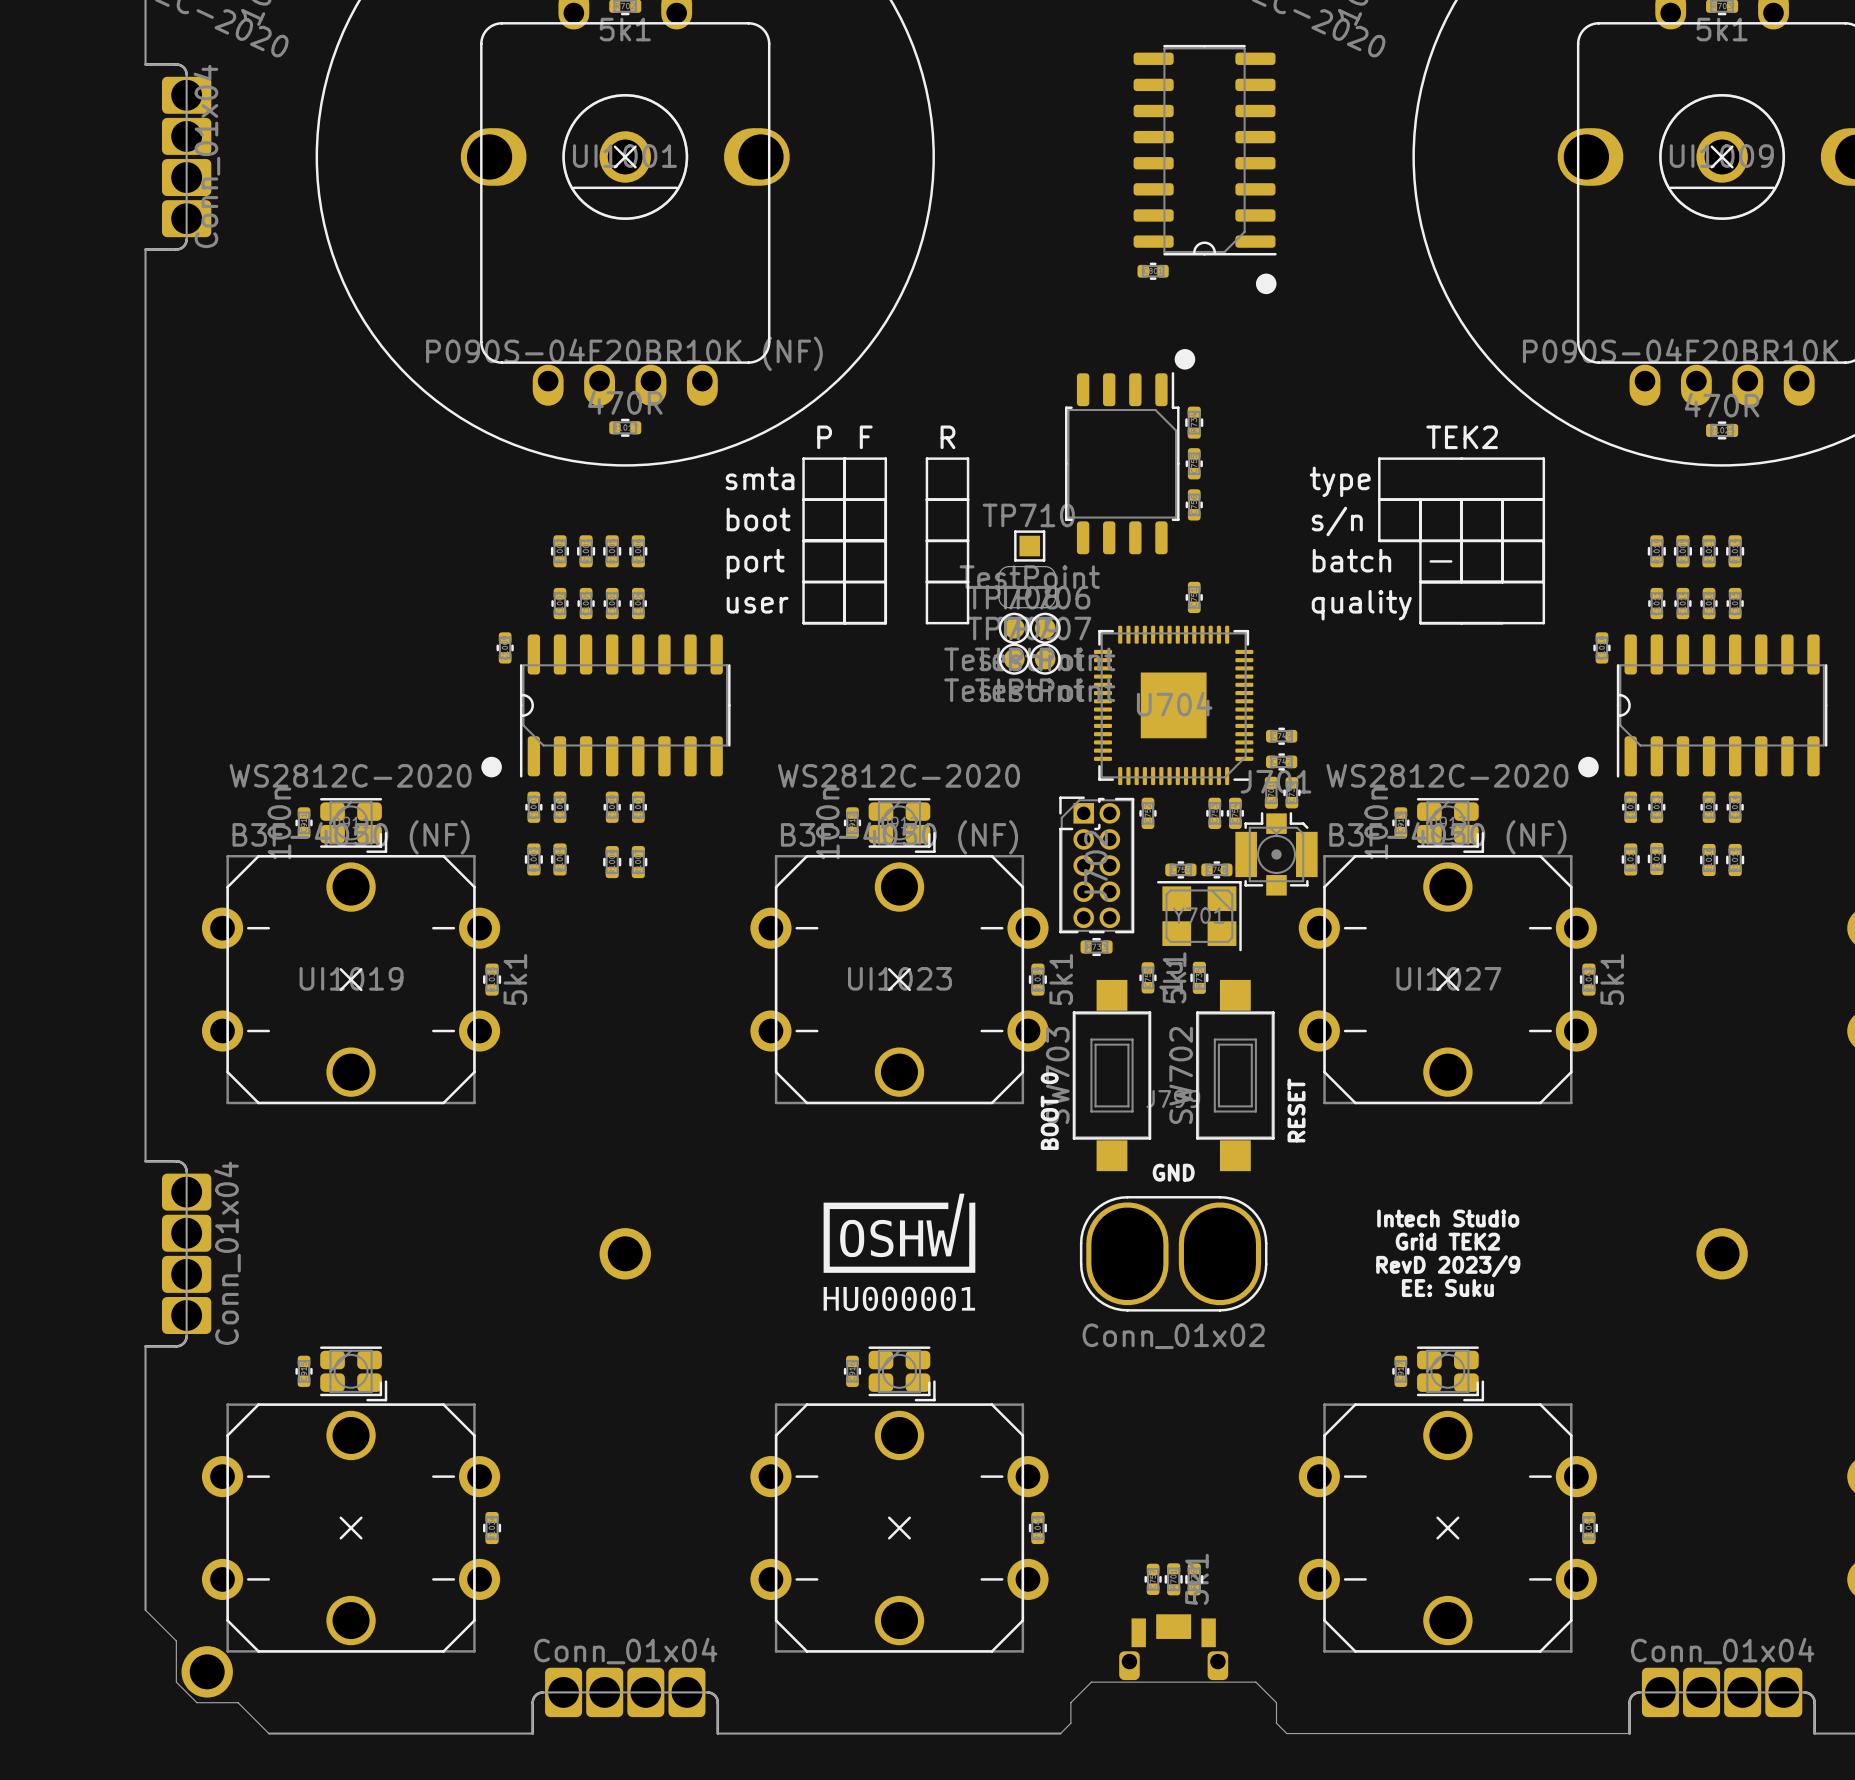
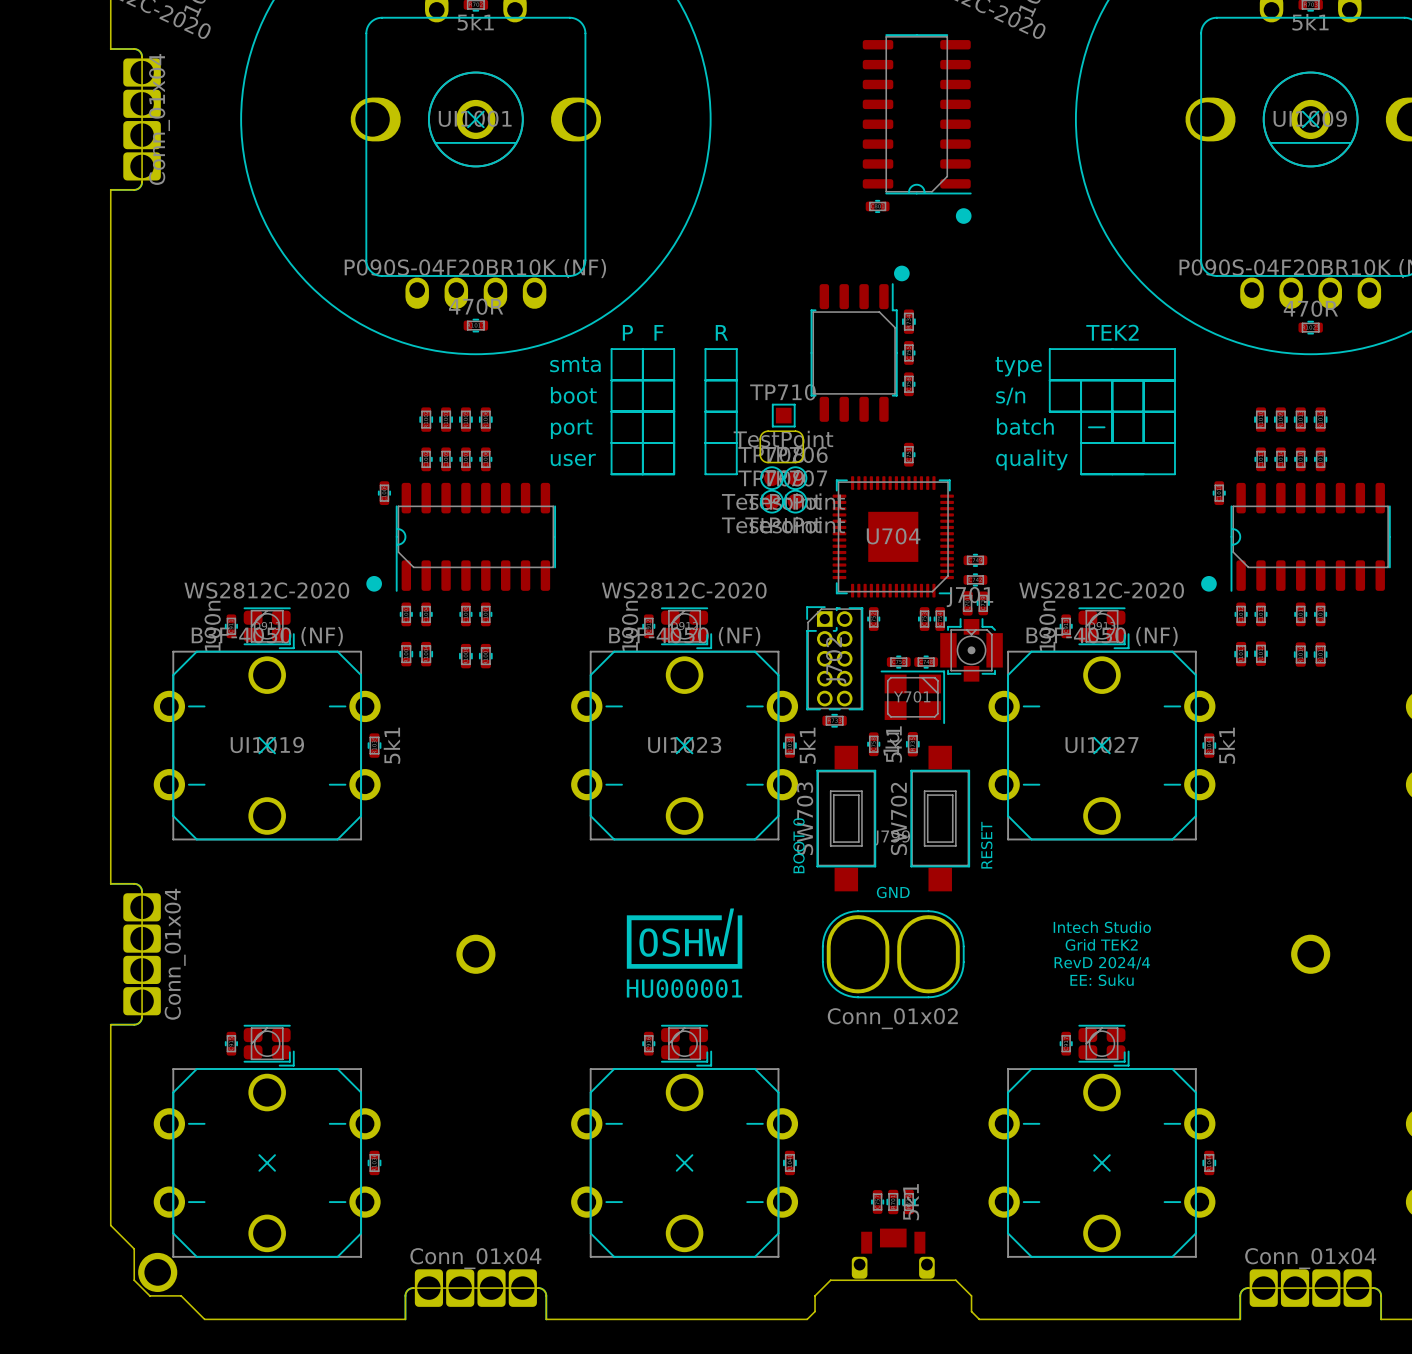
text: RevD 2023/9 (1448, 1266) -> RevD 2024/4 (1102, 963)

